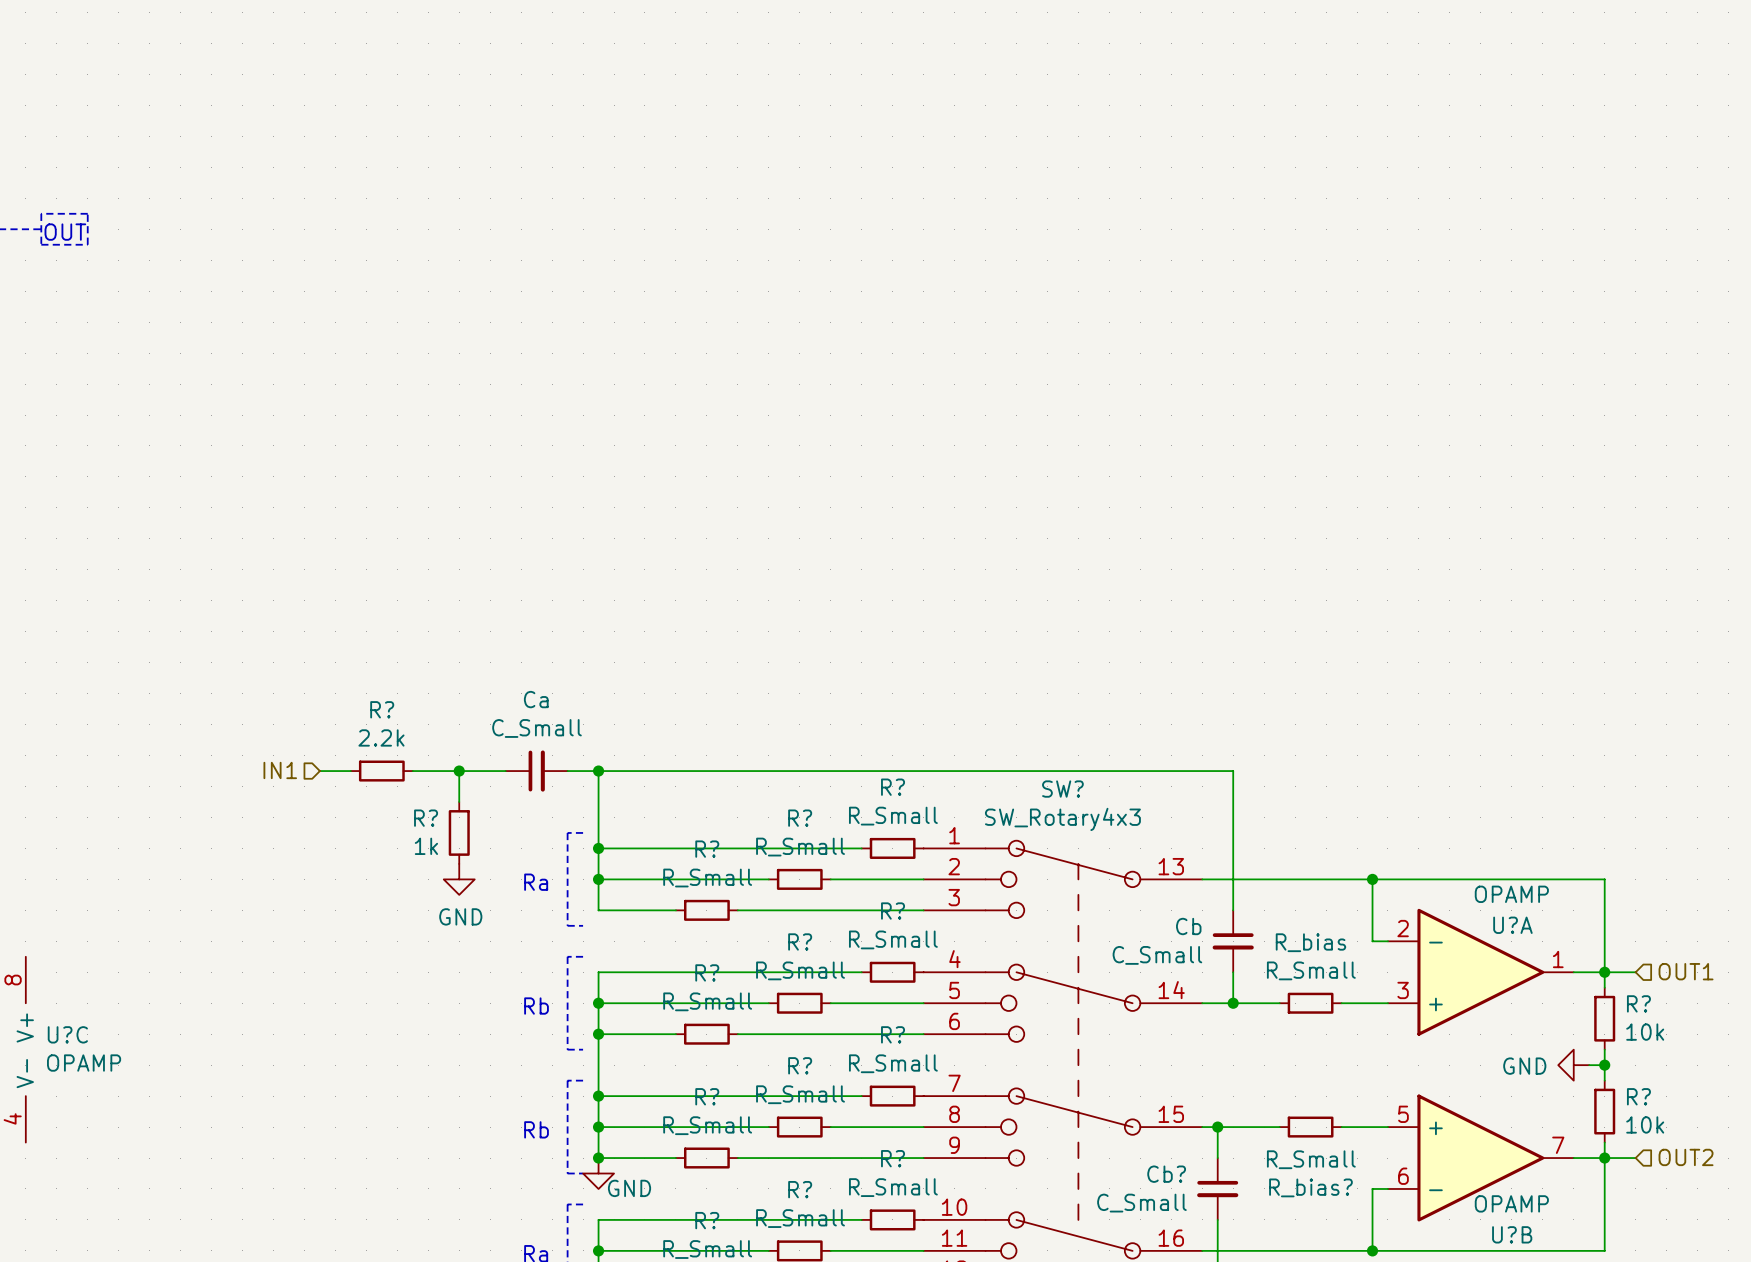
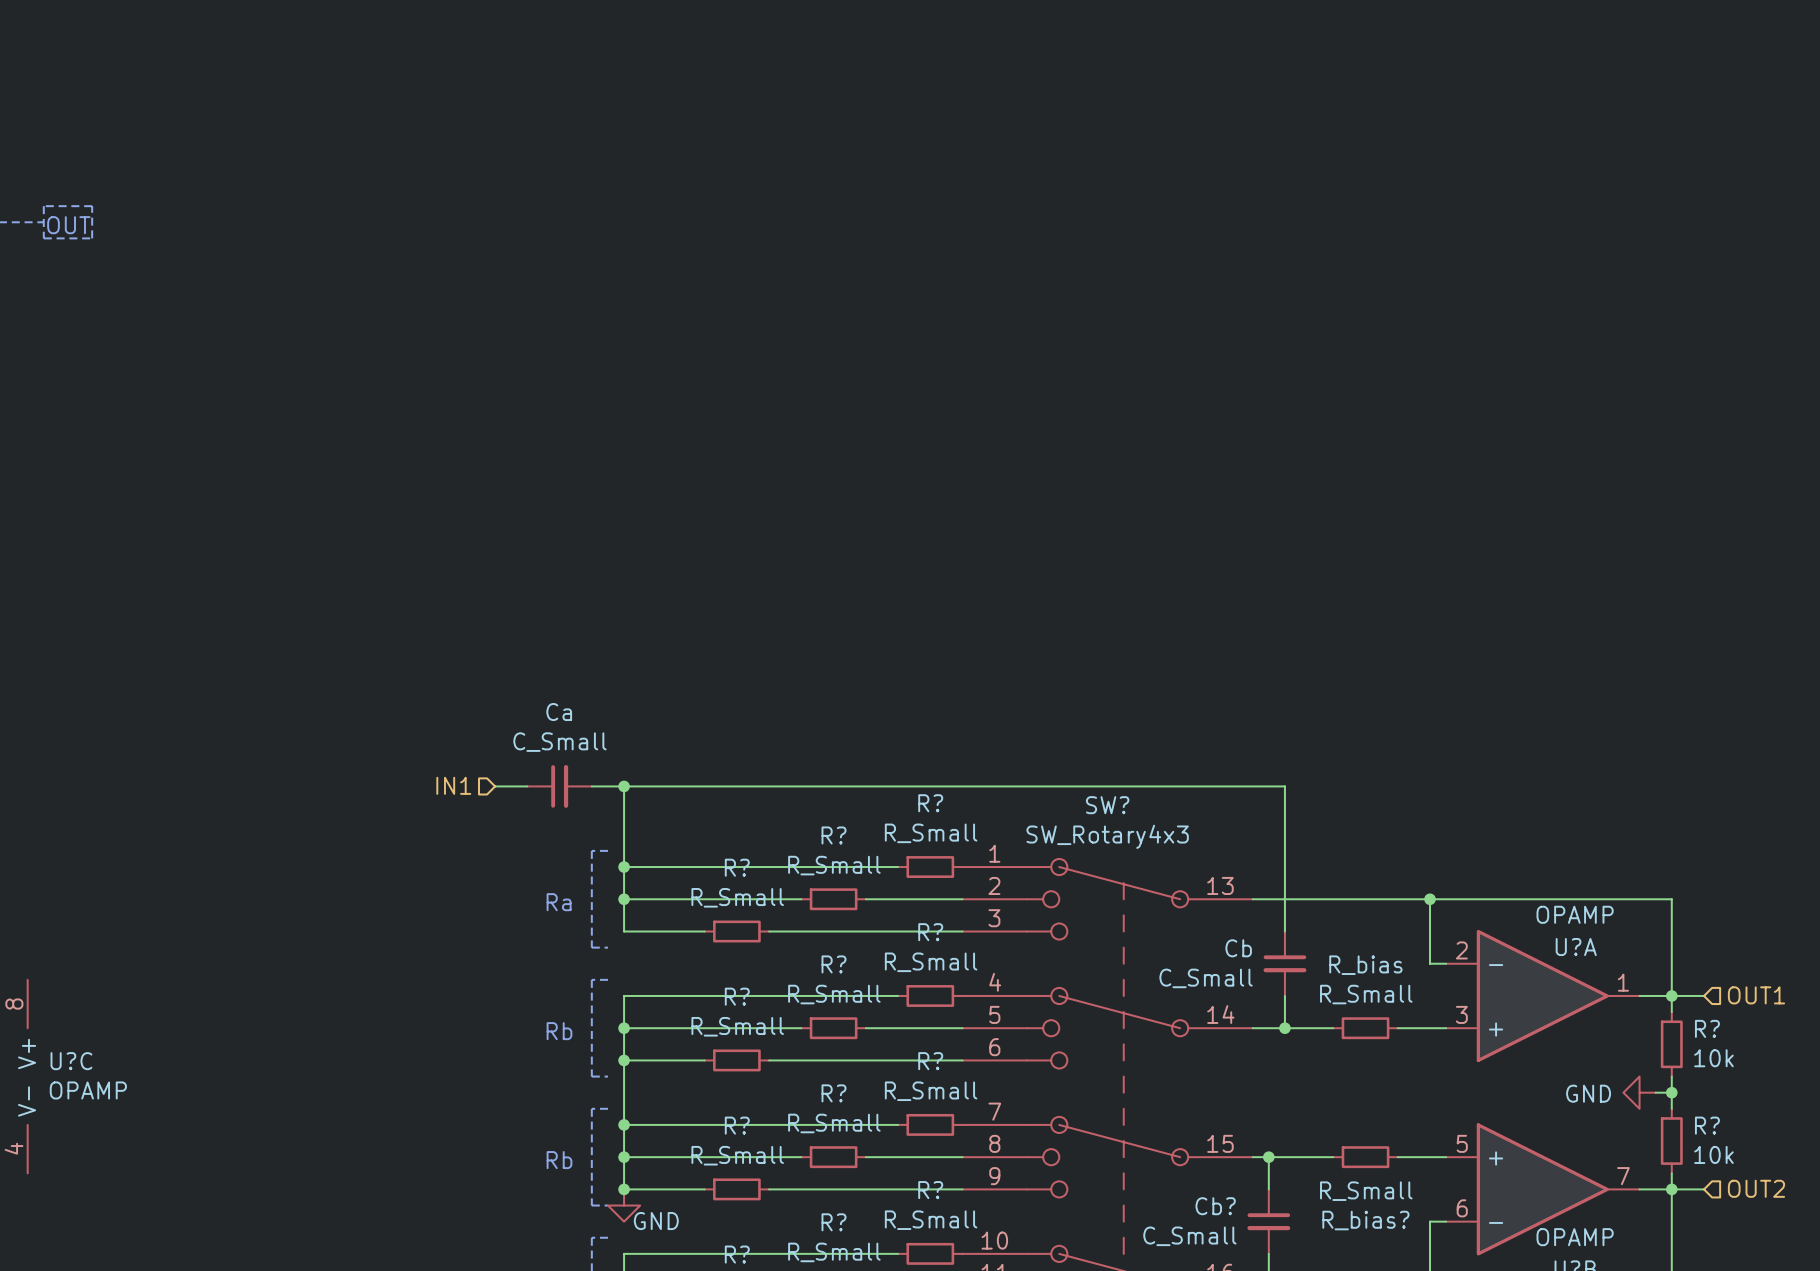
hierarchical label position: IN1 (280, 770) -> IN1 (453, 785)
wire: (319, 771) (350, 771) -> none
R?: 2.2k (381, 771) -> none
wire: (412, 771) (474, 771) -> none
wire: (459, 771) (459, 802) -> none
junction: (459, 771) -> none
R?: 1k (459, 832) -> none
power symbol: GND (459, 879) -> none

